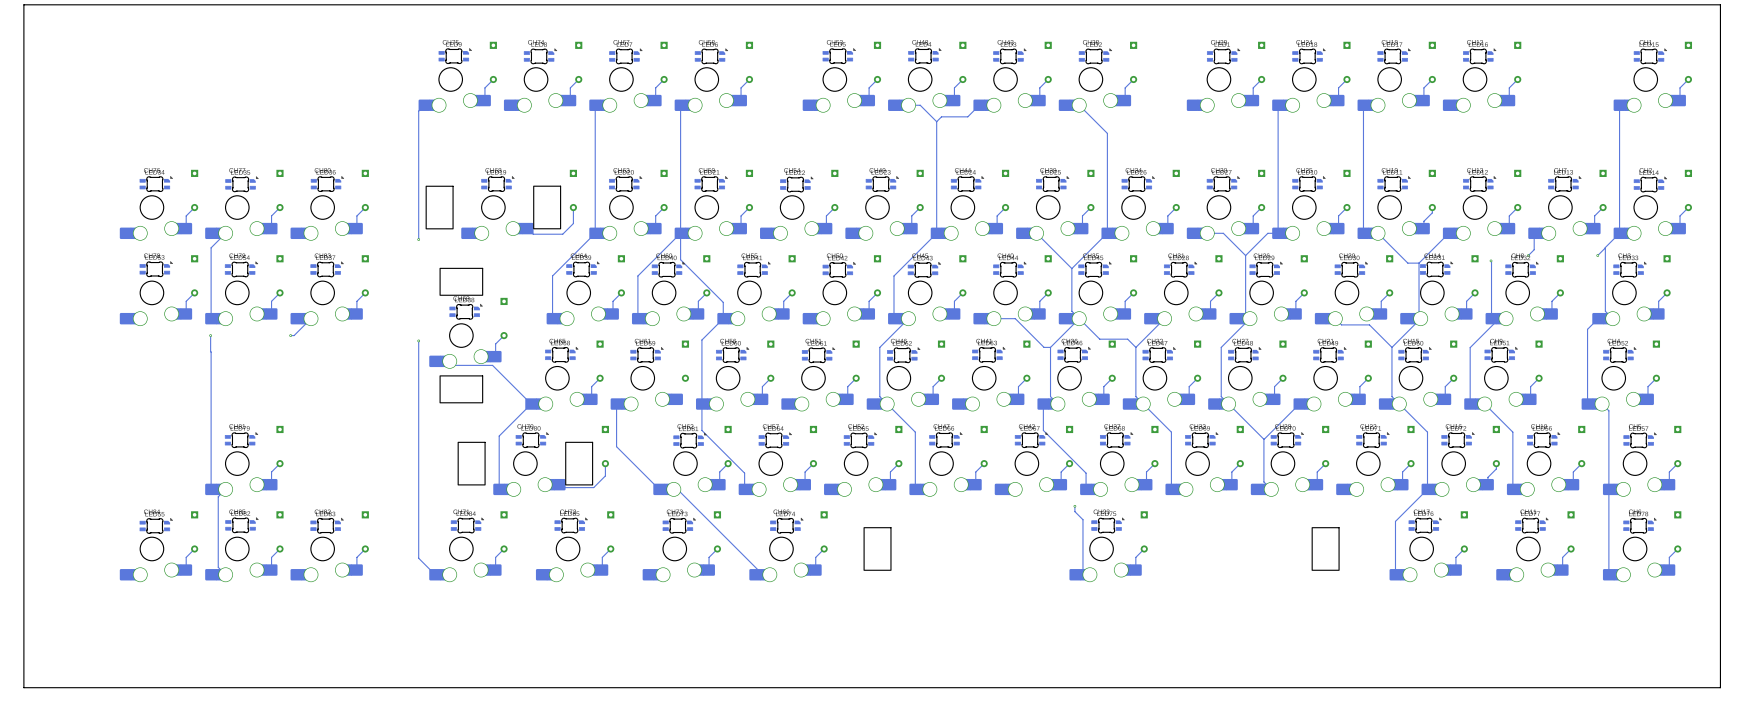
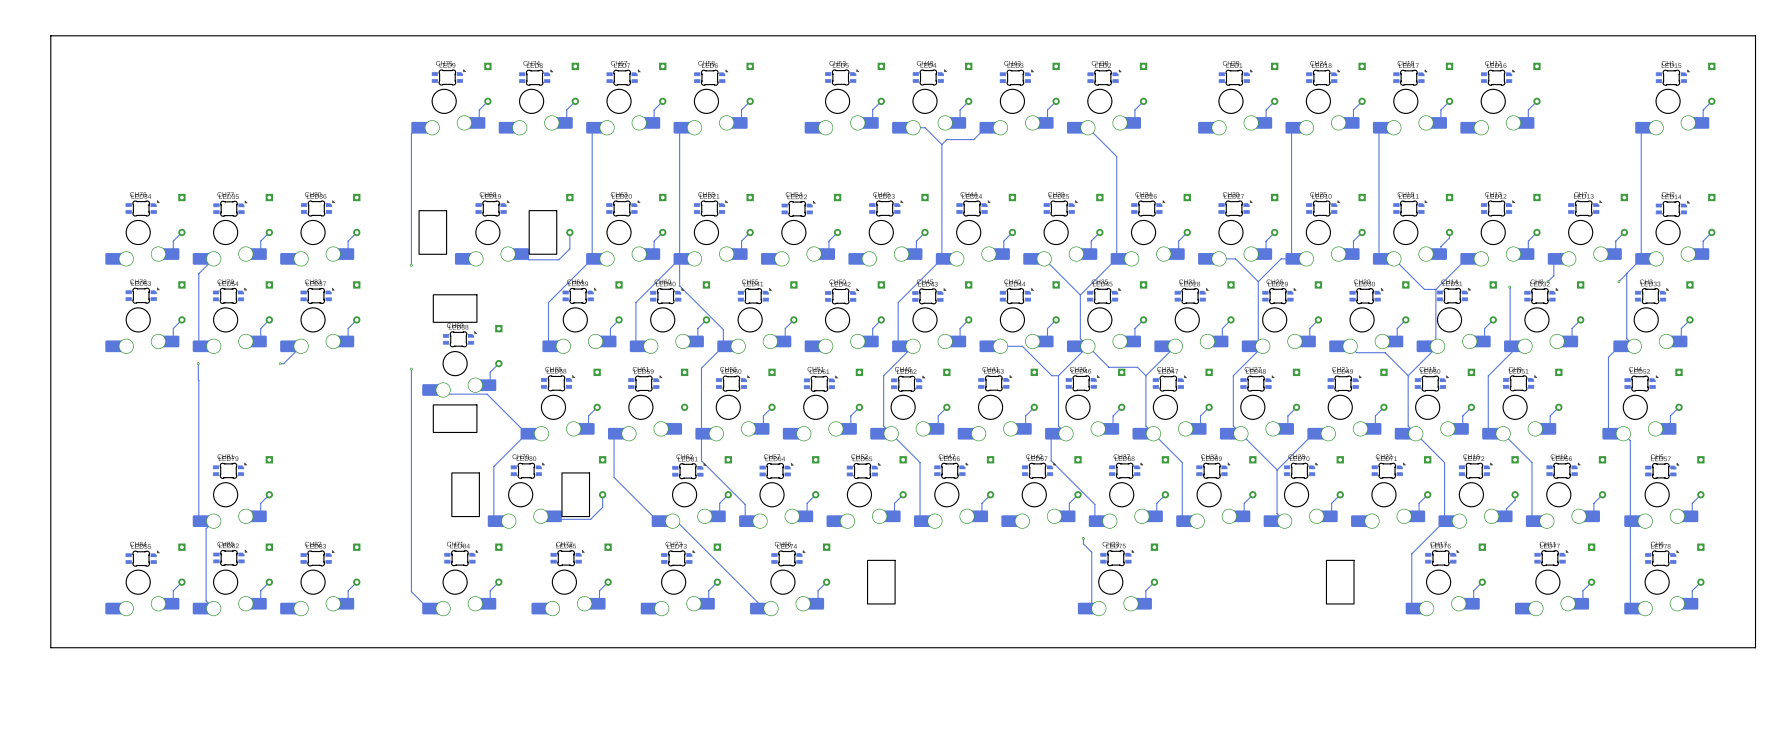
board edge: (1720, 4) (23, 4) (23, 687) (1720, 687) (1720, 4) -> (1755, 35) (1755, 647) (50, 647) (50, 35) (1755, 35)

